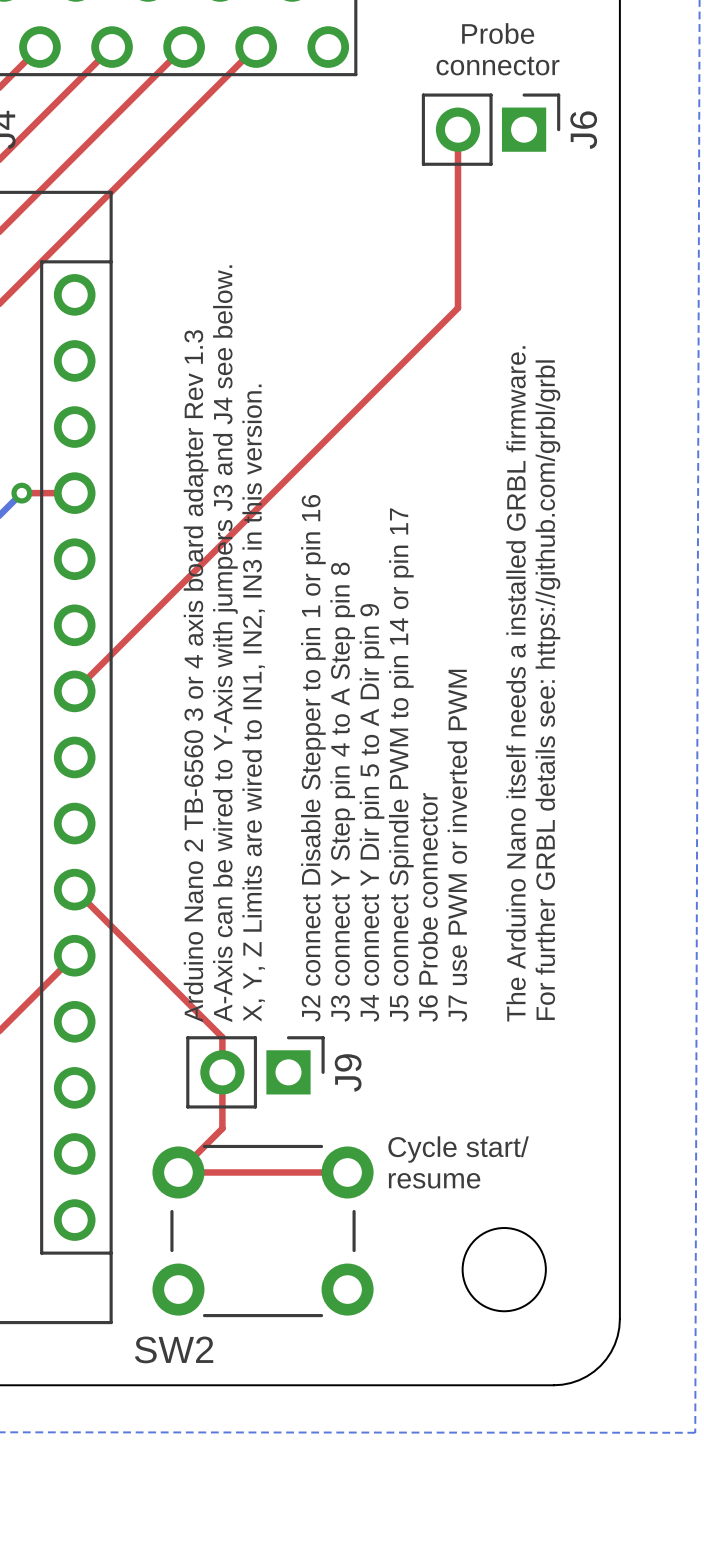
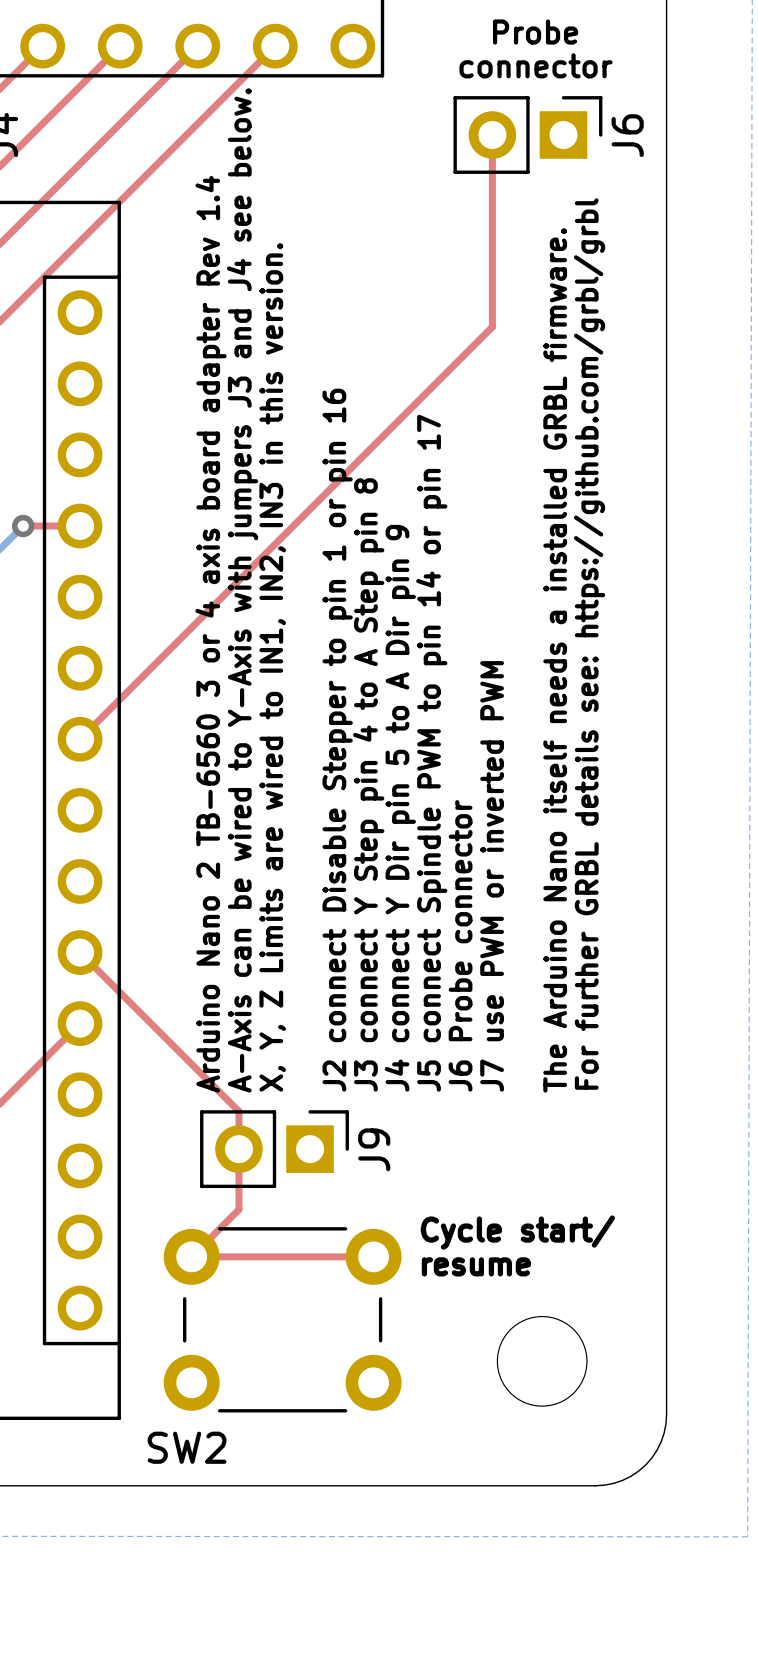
text: Arduino Nano 2 TB-6560 3 or 4 axis board adapter Rev 1.3 (196, 676) -> Arduino Nano 2 TB-6560 3 or 4 axis board adapter Rev 1.4 (211, 634)

